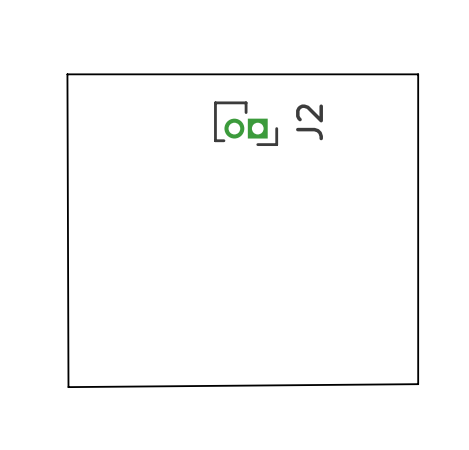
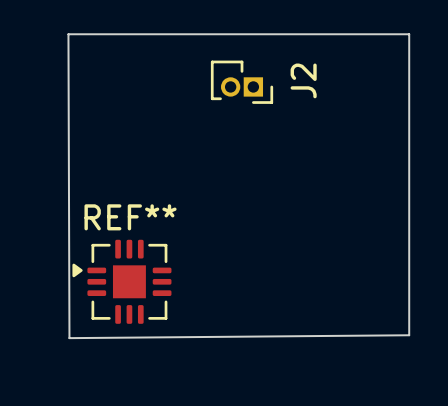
REF**: none -> (121, 281)

